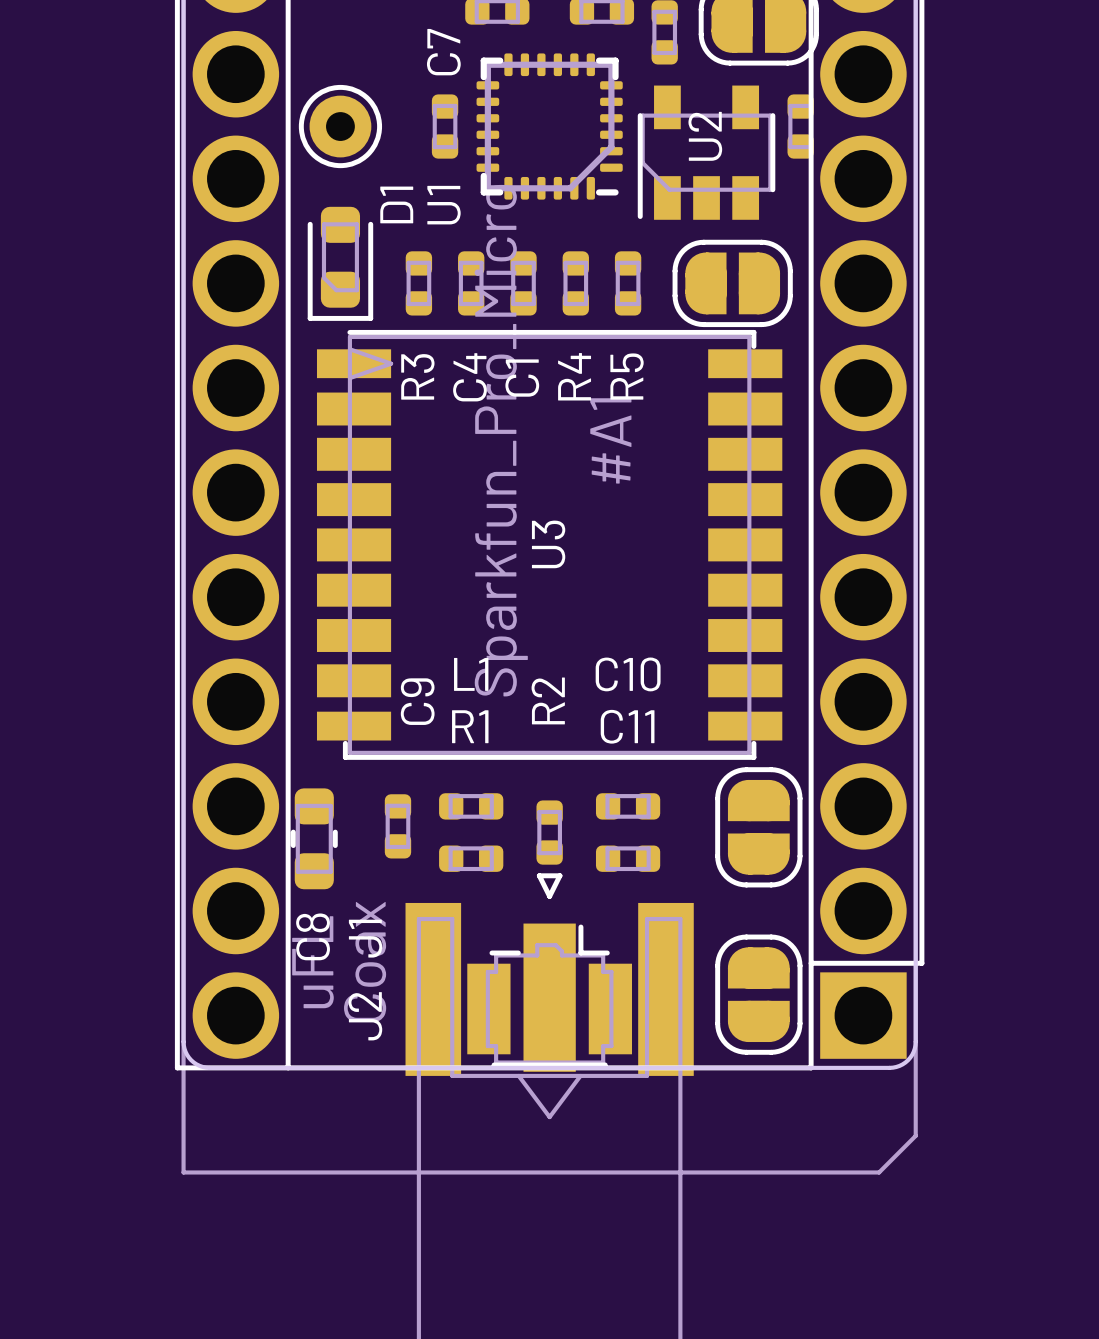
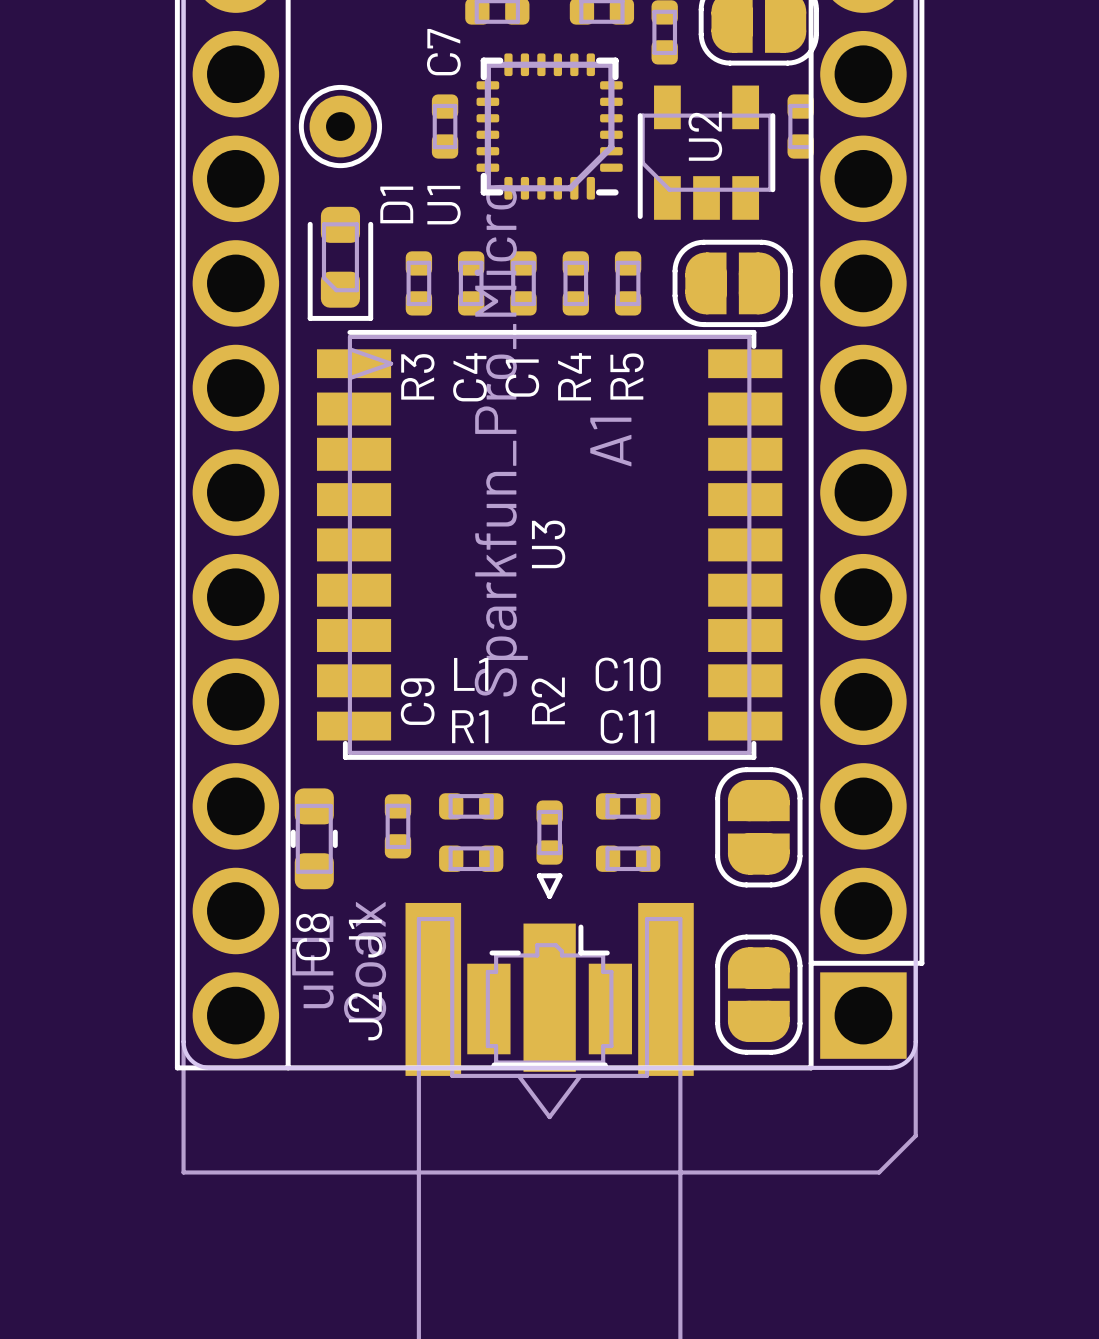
#A1 name: #A1 (610, 440) -> A1 (610, 442)

